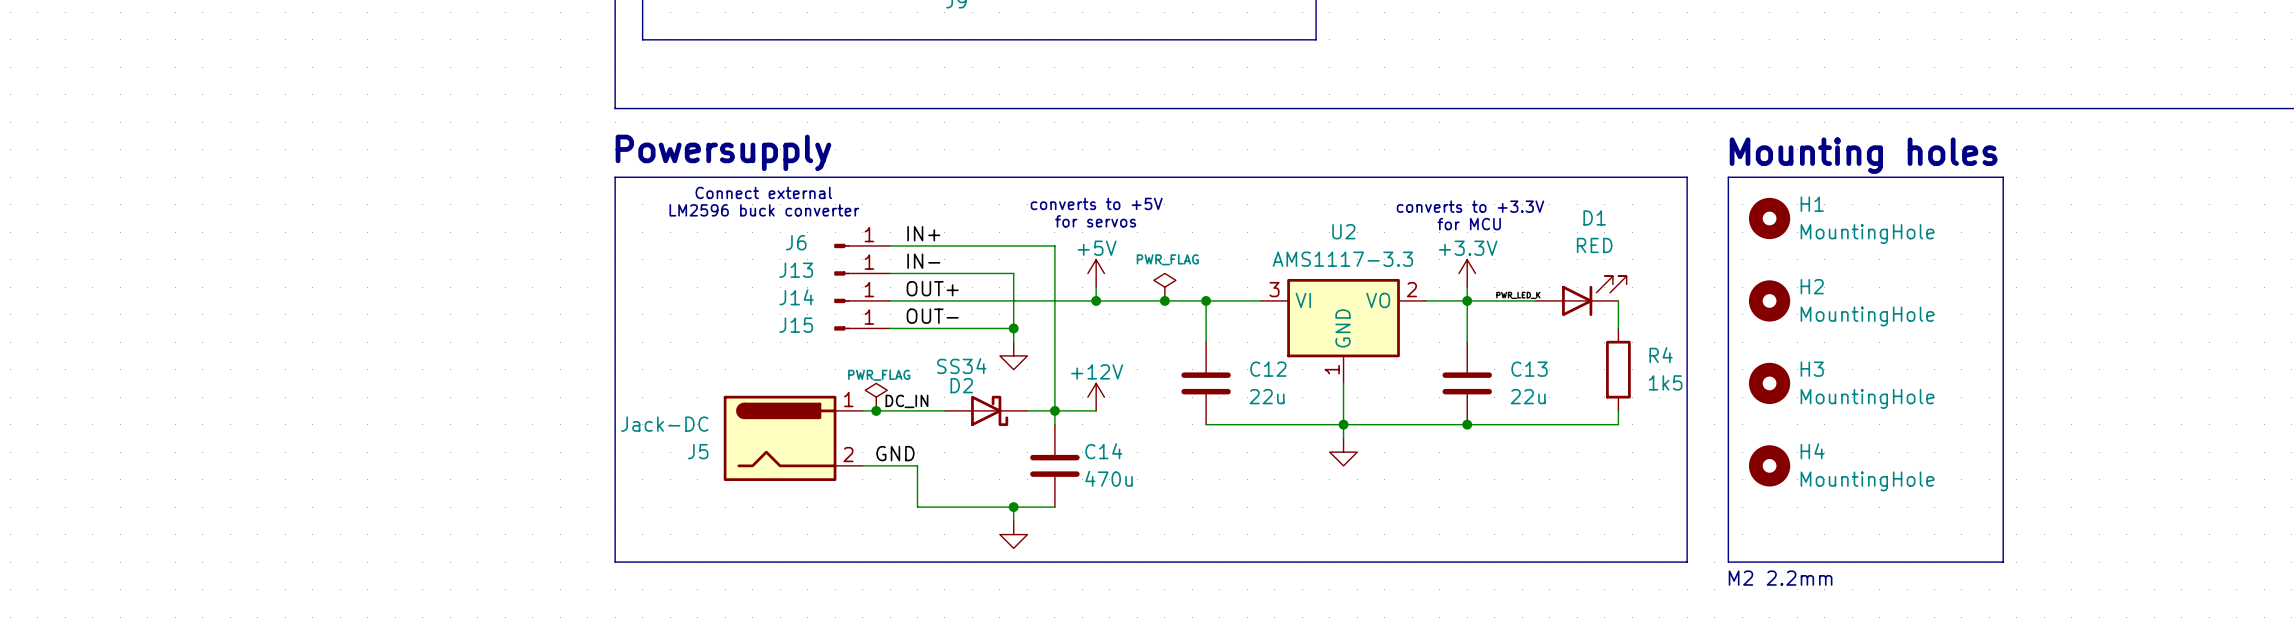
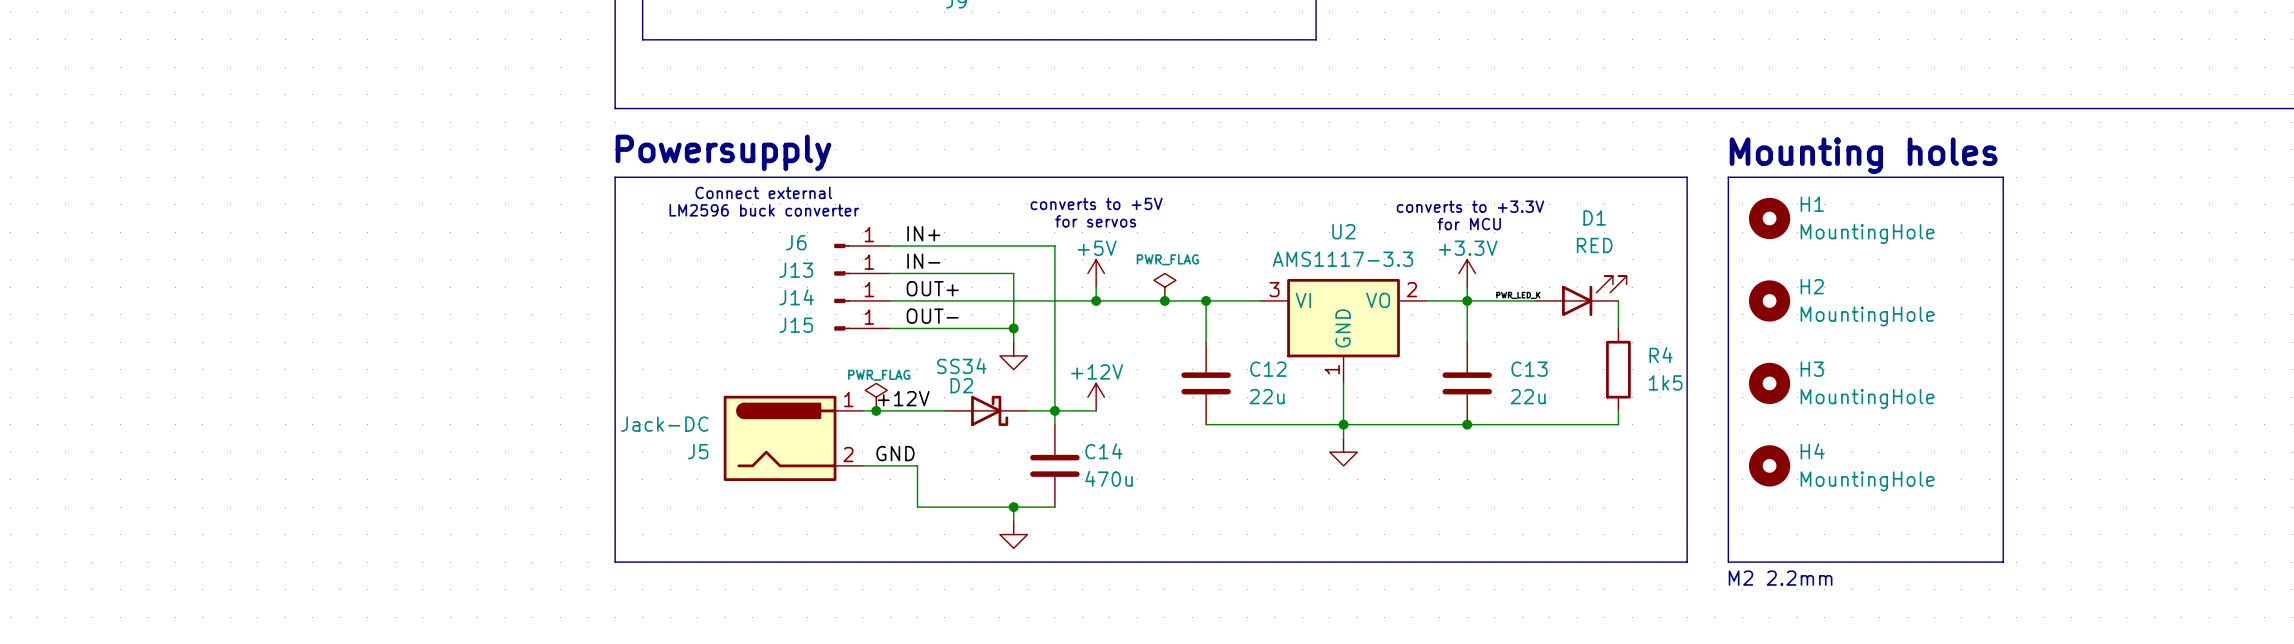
label: DC_IN (906, 401) -> +12V (903, 398)

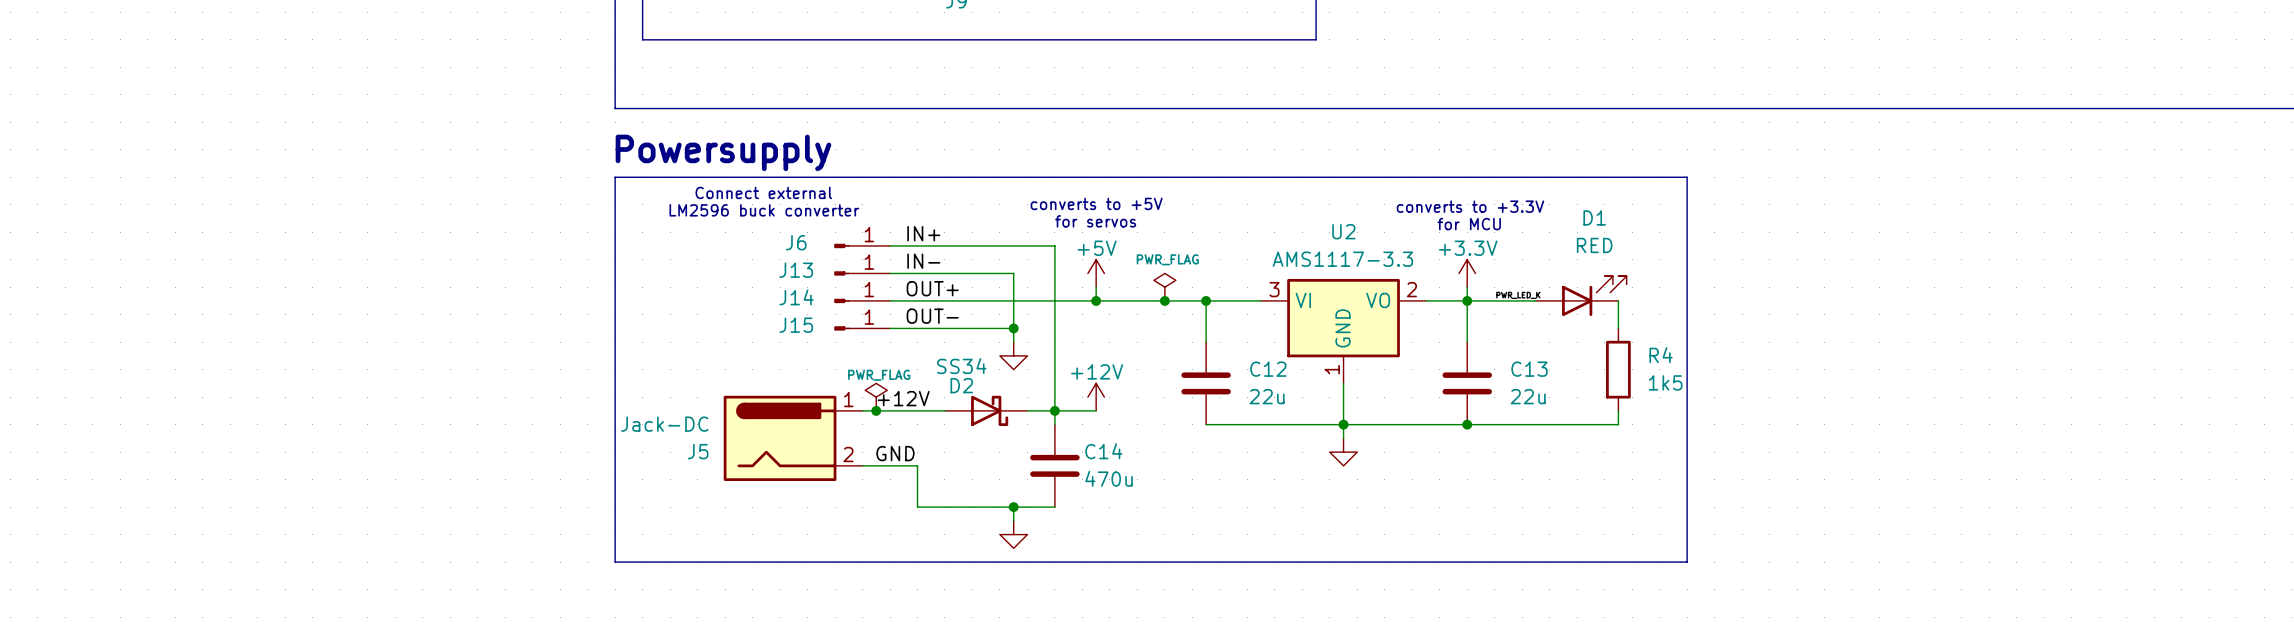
text: Mounting holes (1863, 155) -> none
line: (1728, 177) (2003, 177) (2003, 562) (1728, 562) (1728, 177) -> none
H1: MountingHole (1769, 218) -> none
H2: MountingHole (1769, 300) -> none
H3: MountingHole (1769, 383) -> none
H4: MountingHole (1769, 465) -> none
text: M2 2.2mm (1780, 578) -> none

